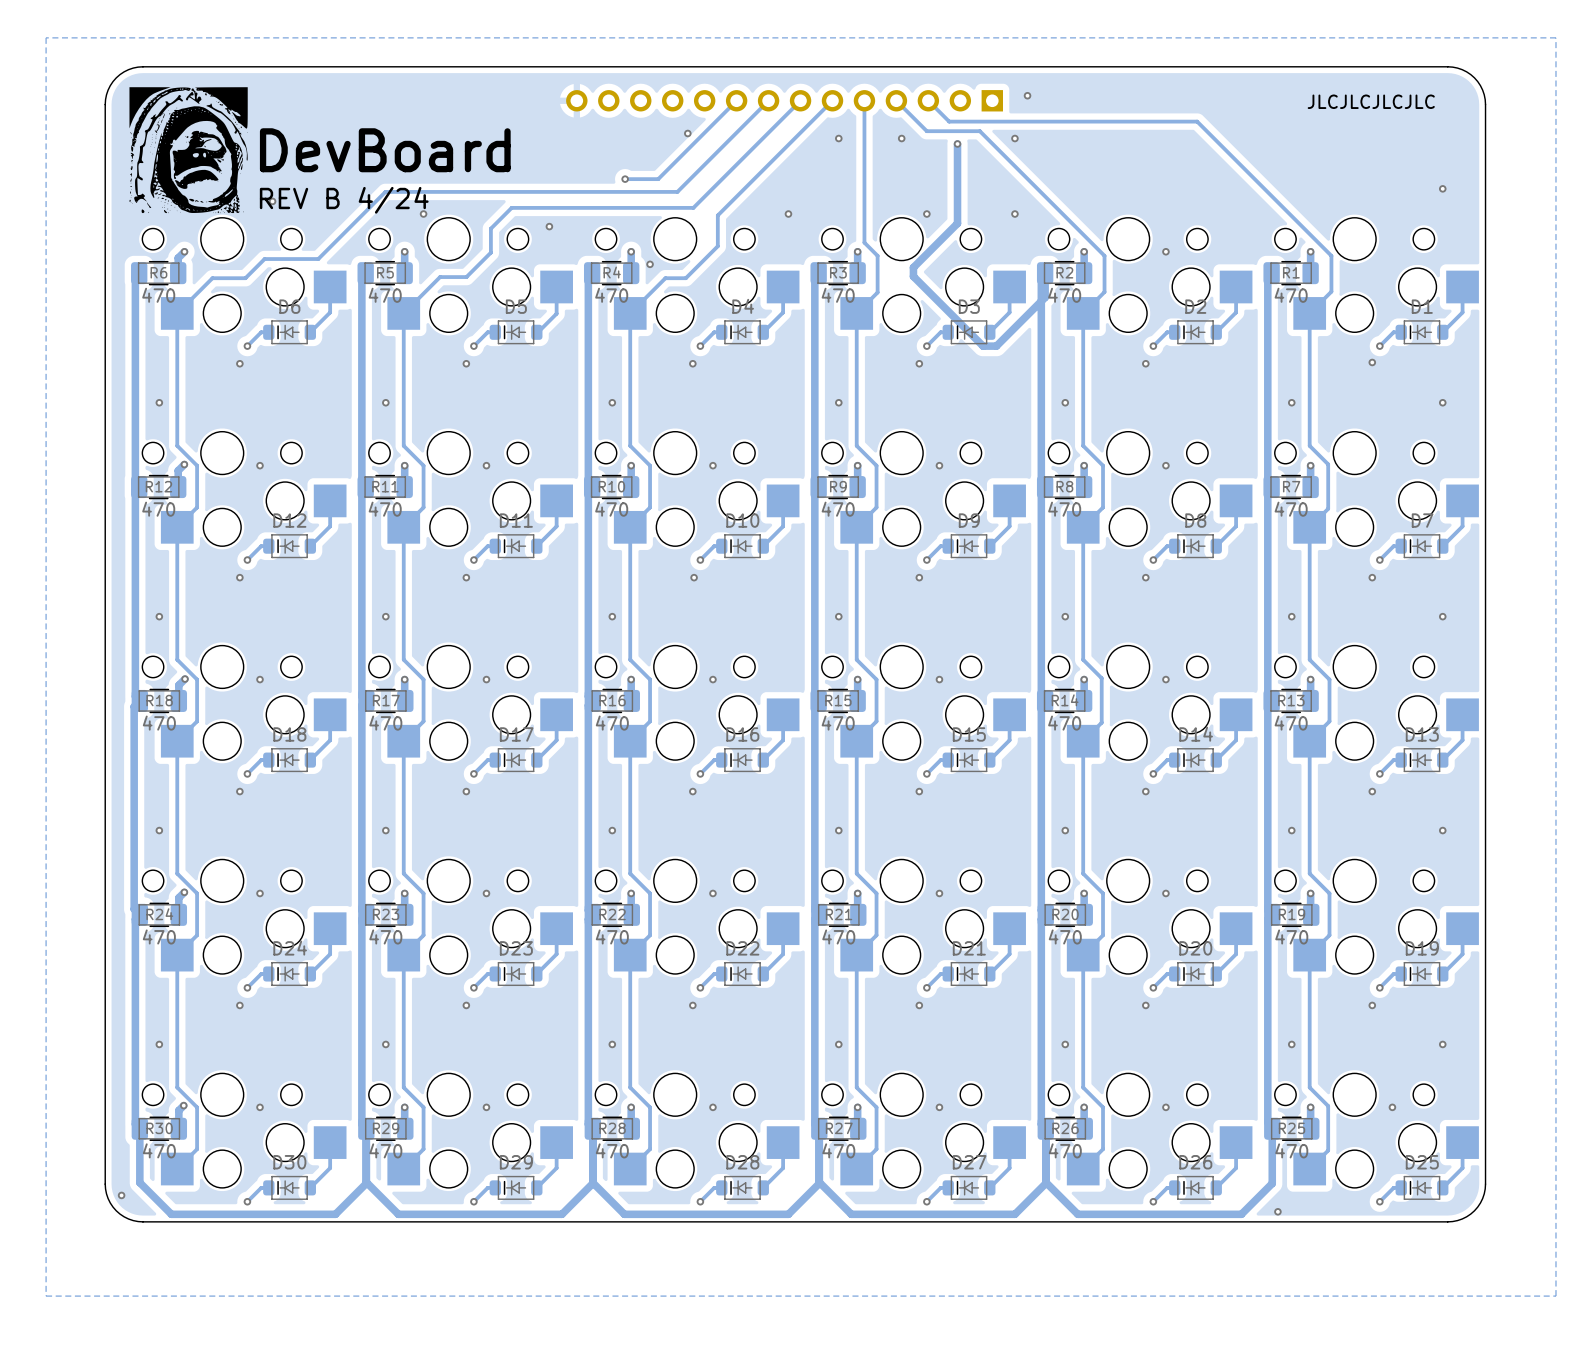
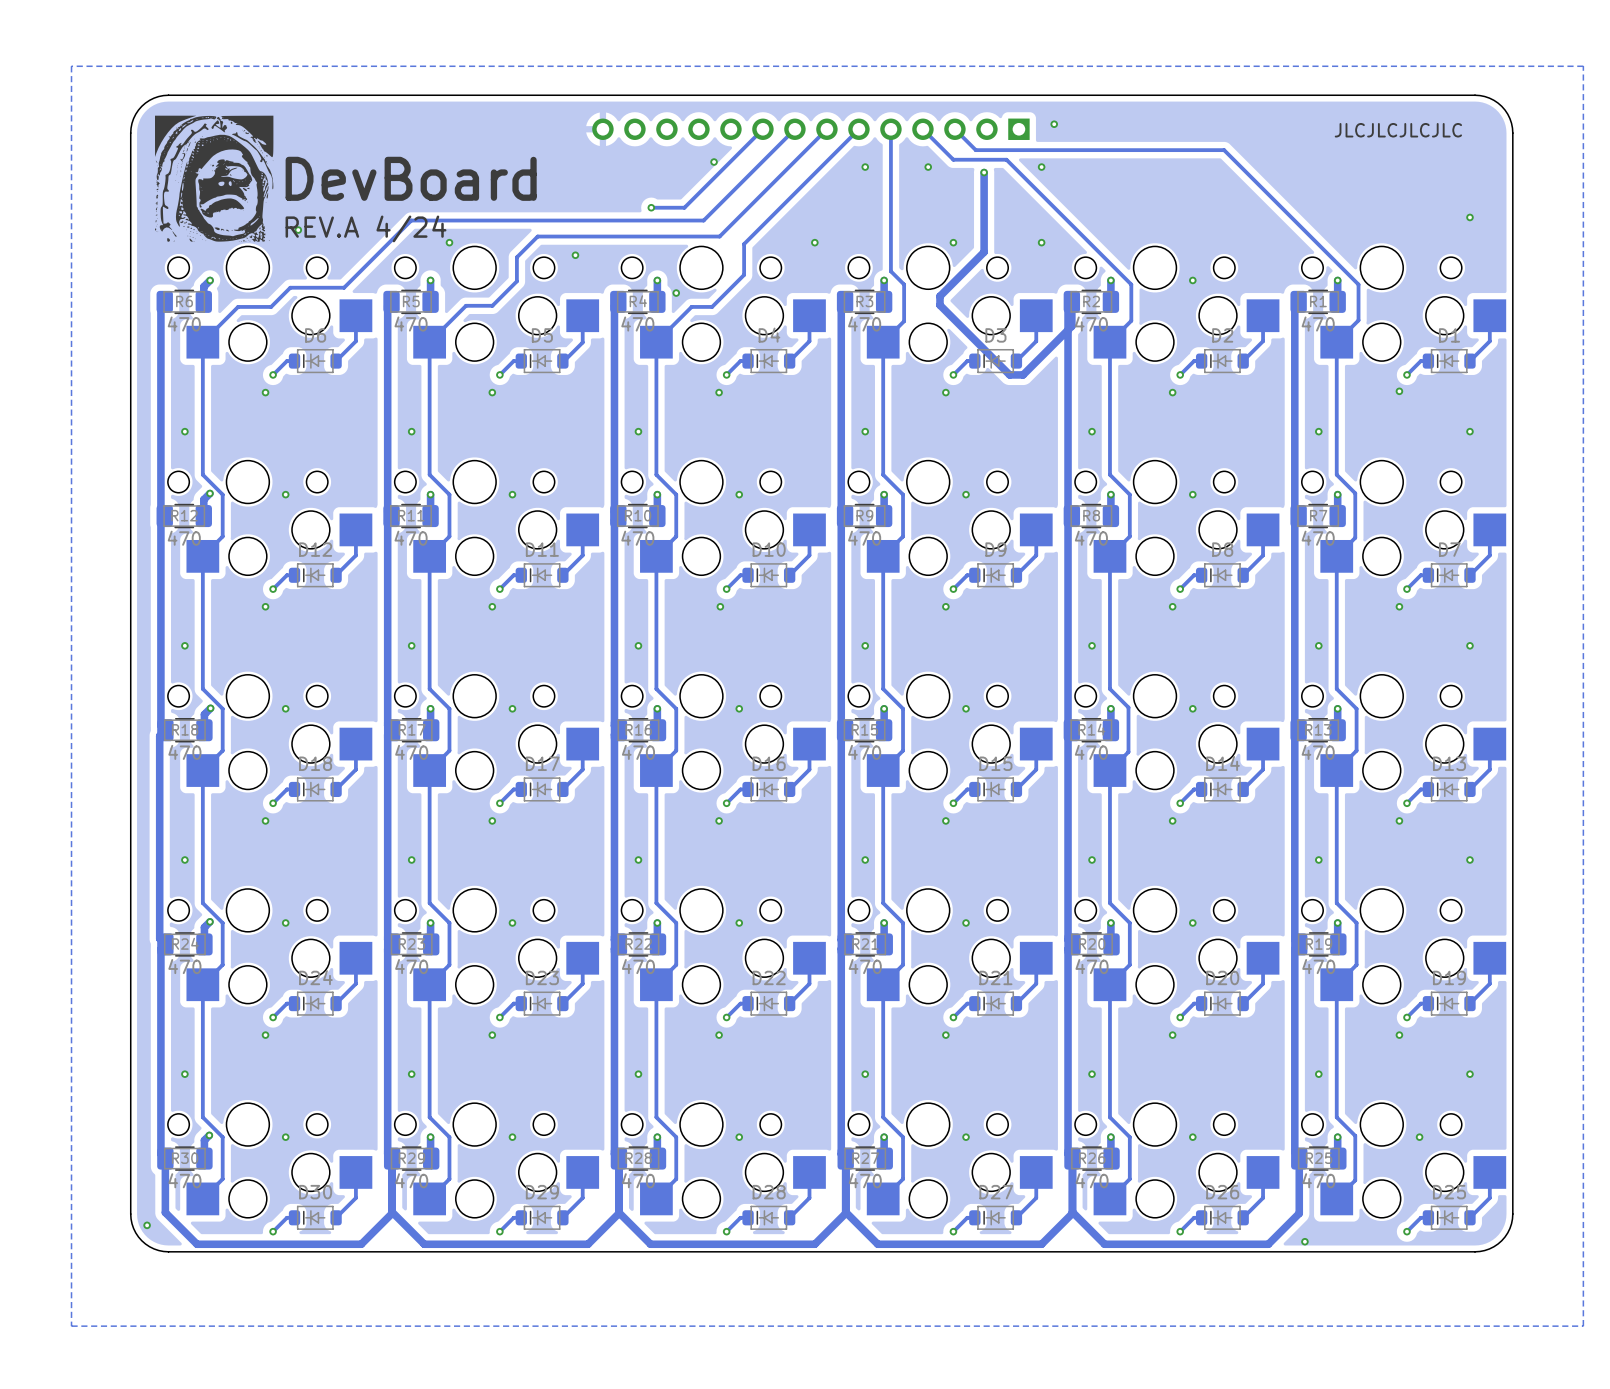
text: REV B 4/24 (344, 200) -> REV.A 4/24 (366, 228)

